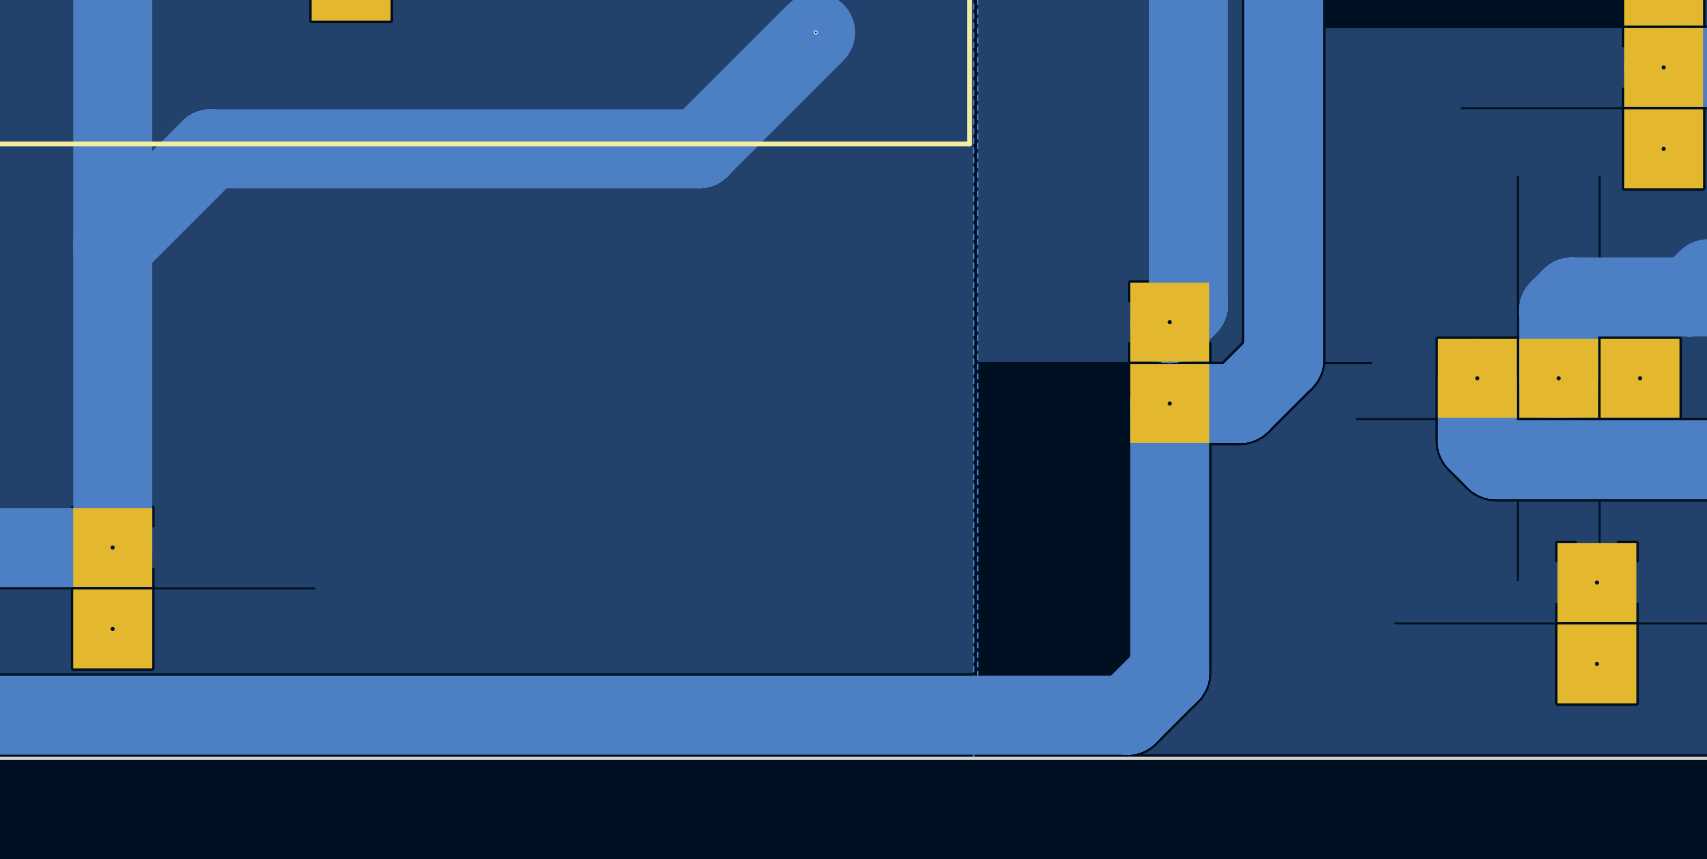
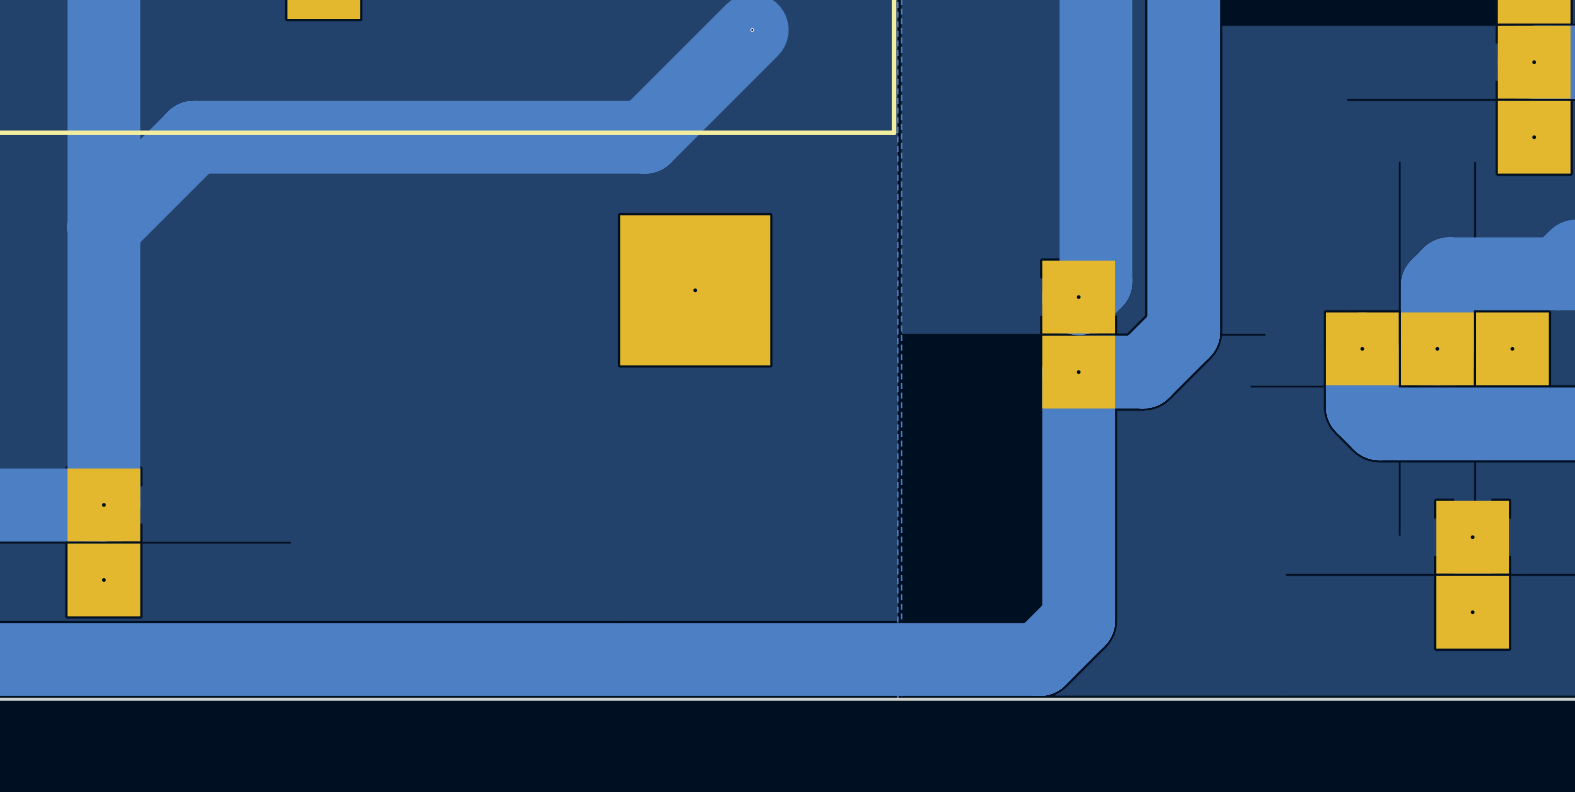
part: none -> (695, 290)

